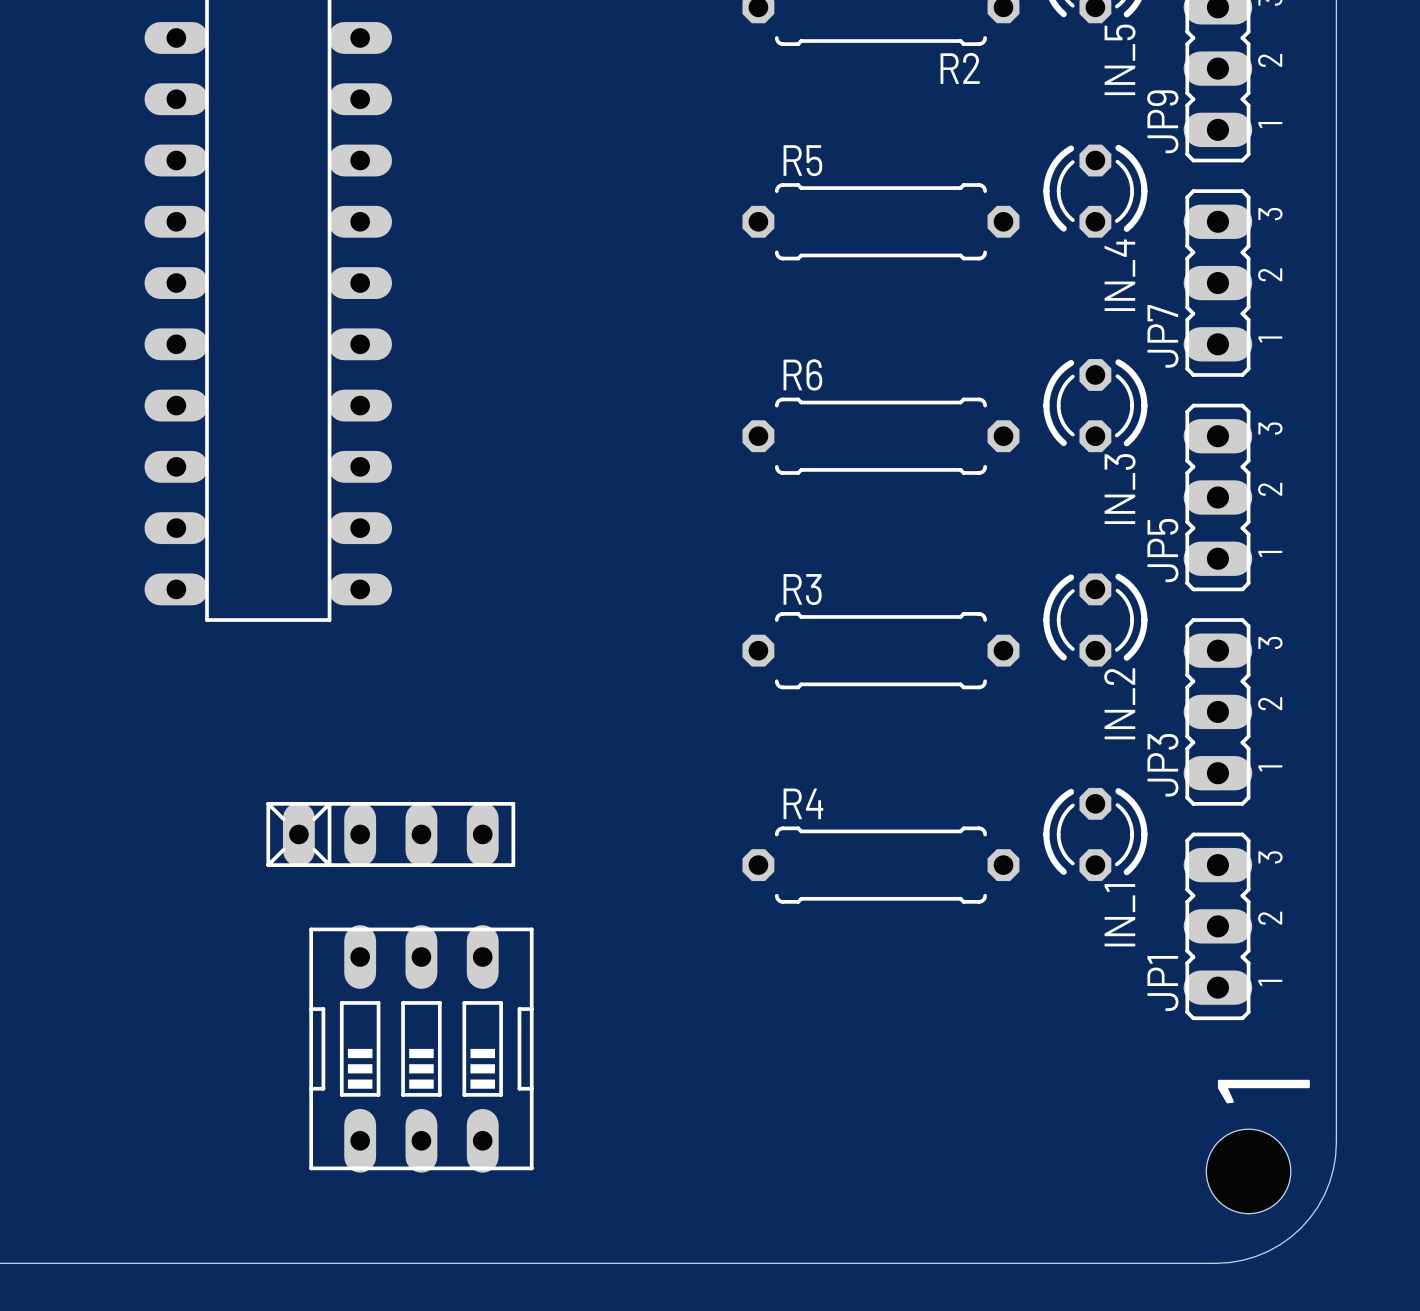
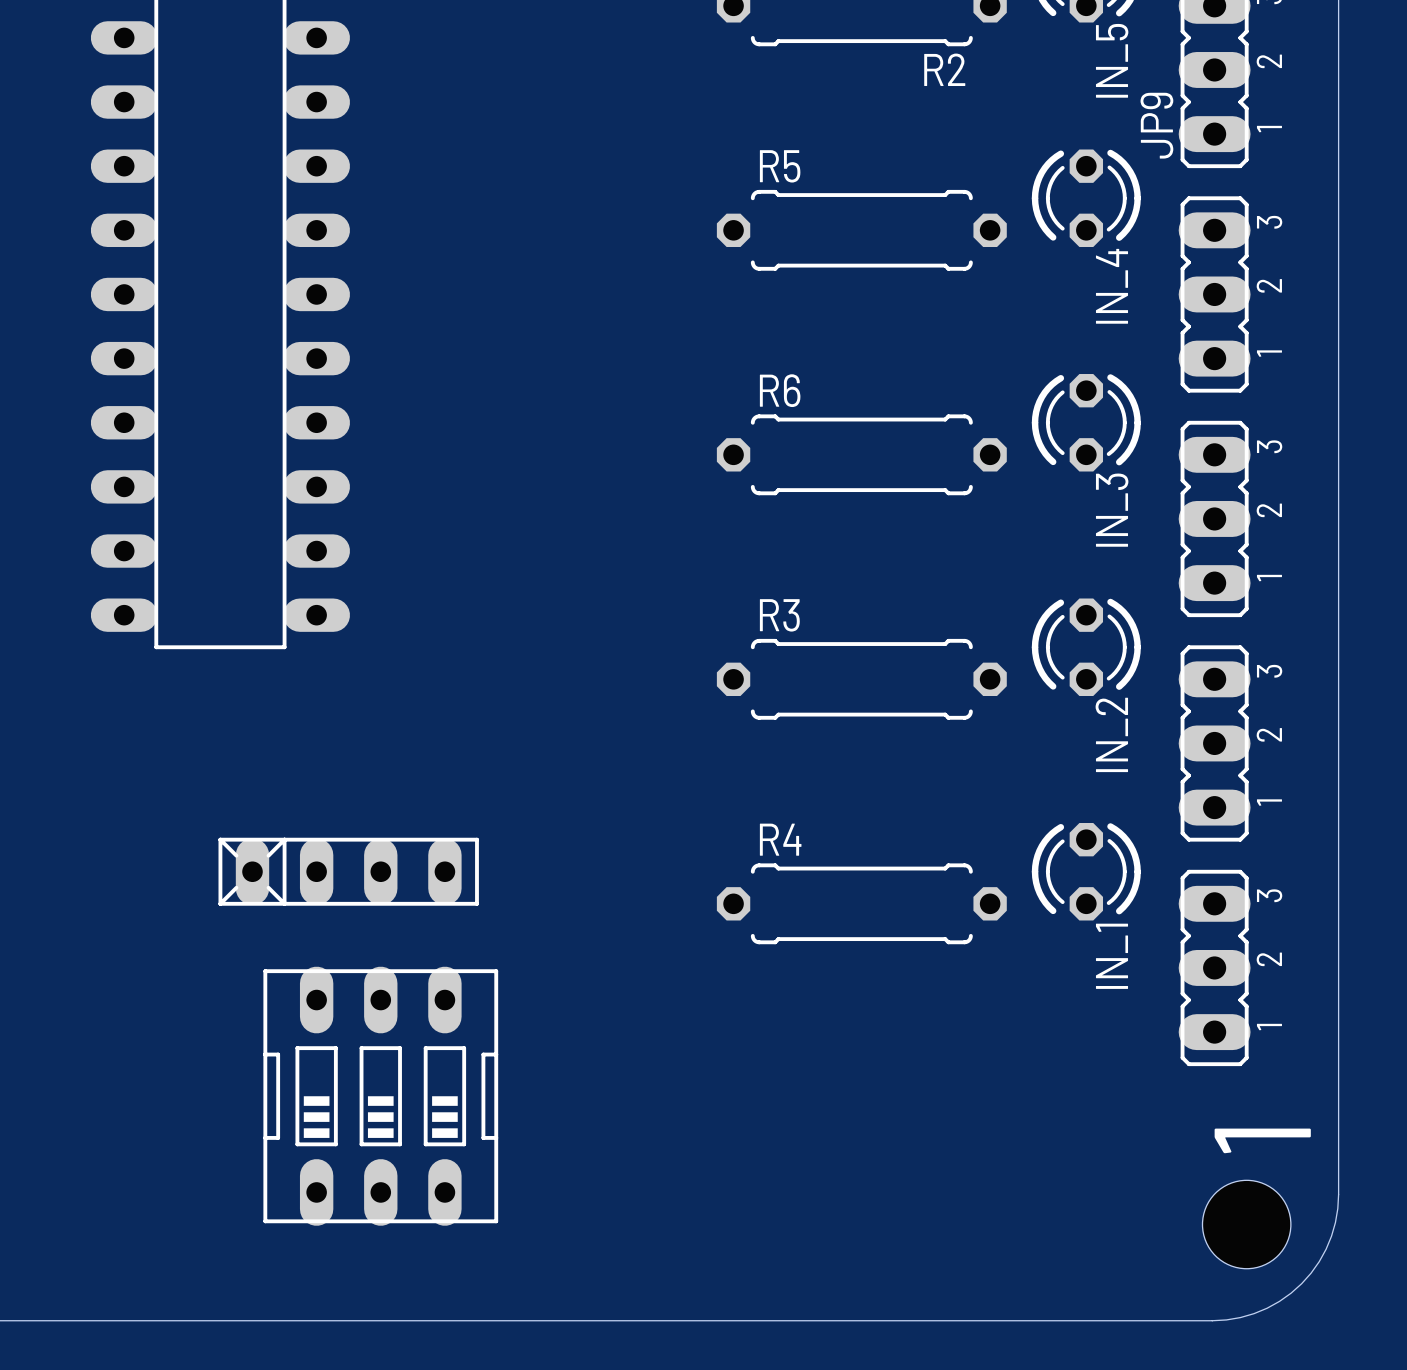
JP7 name: JP7 (1162, 336) -> none
JP5 name: JP5 (1162, 550) -> none
JP3 name: JP3 (1162, 765) -> none
JP1 name: JP1 (1162, 983) -> none

